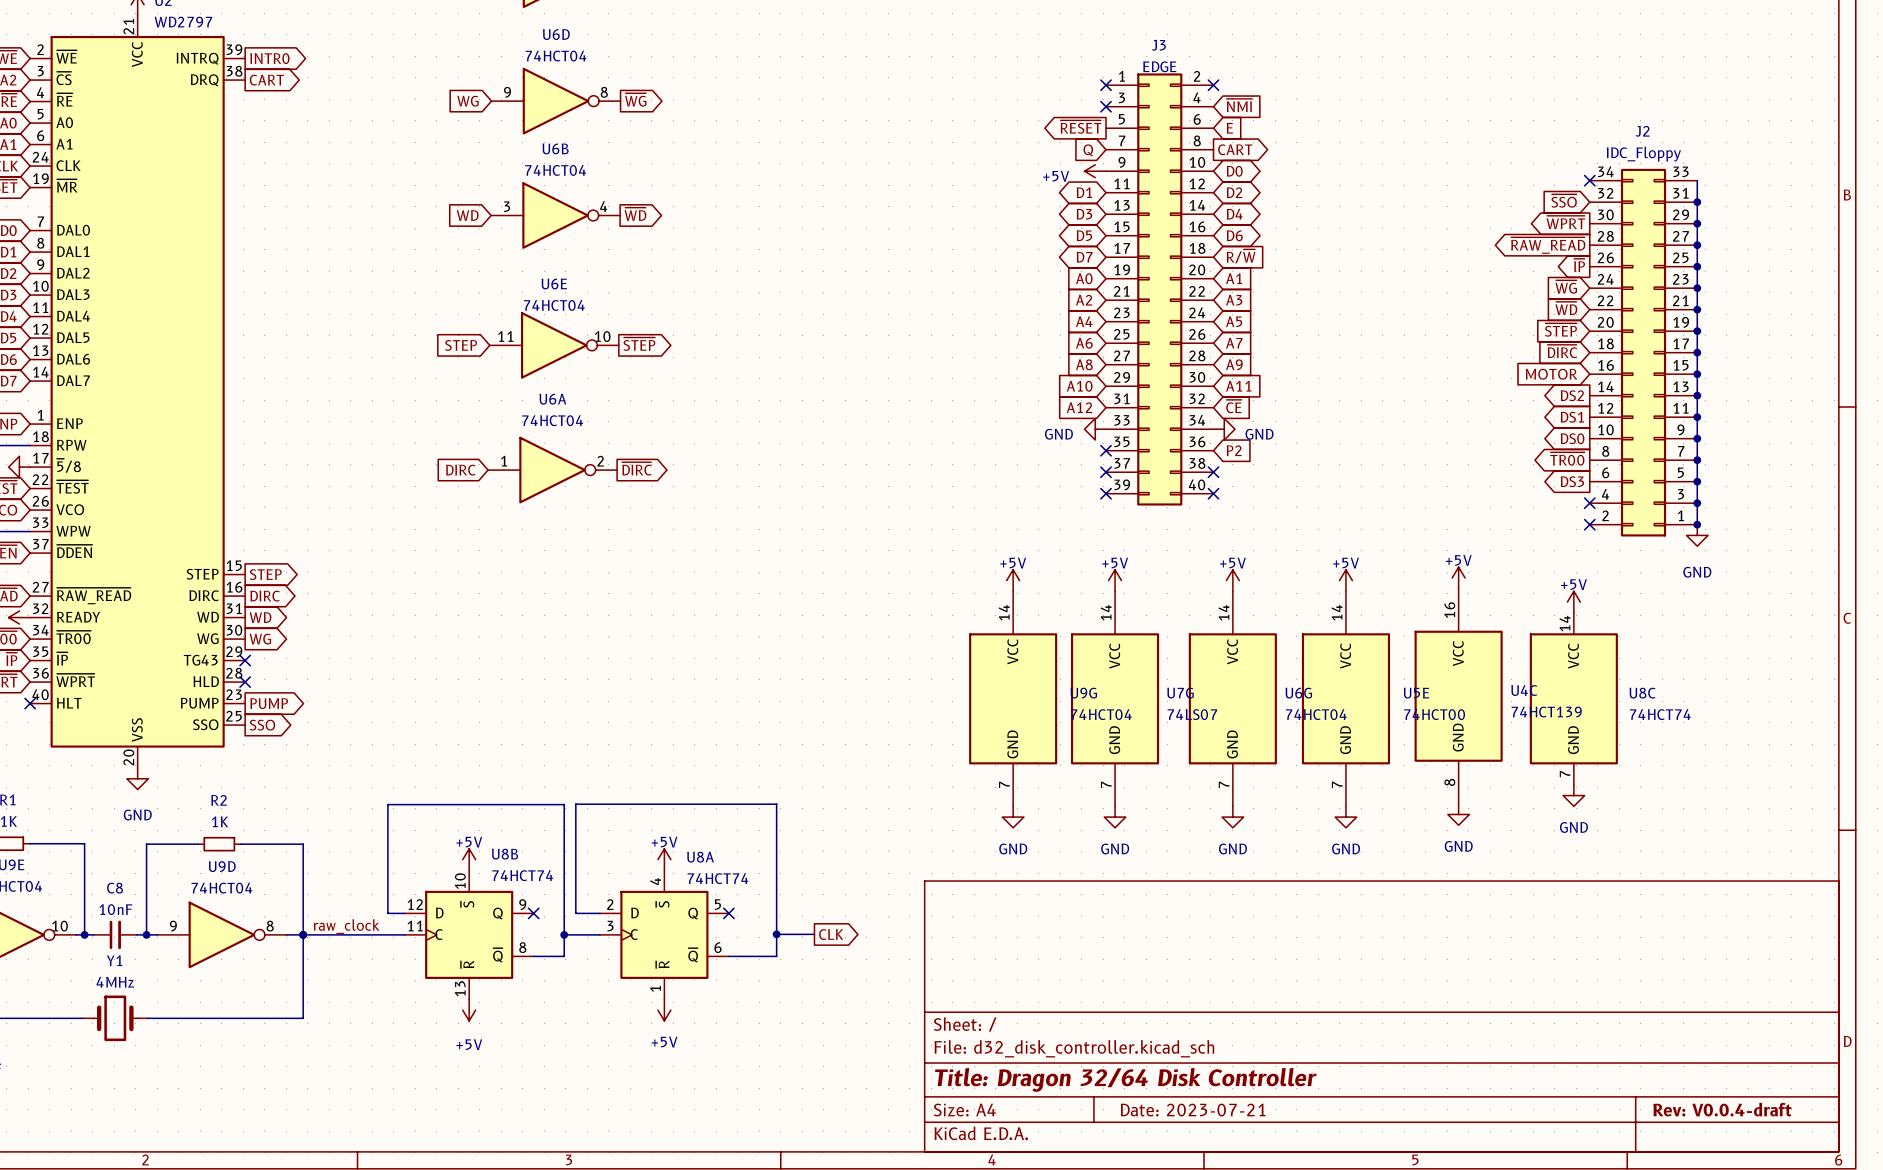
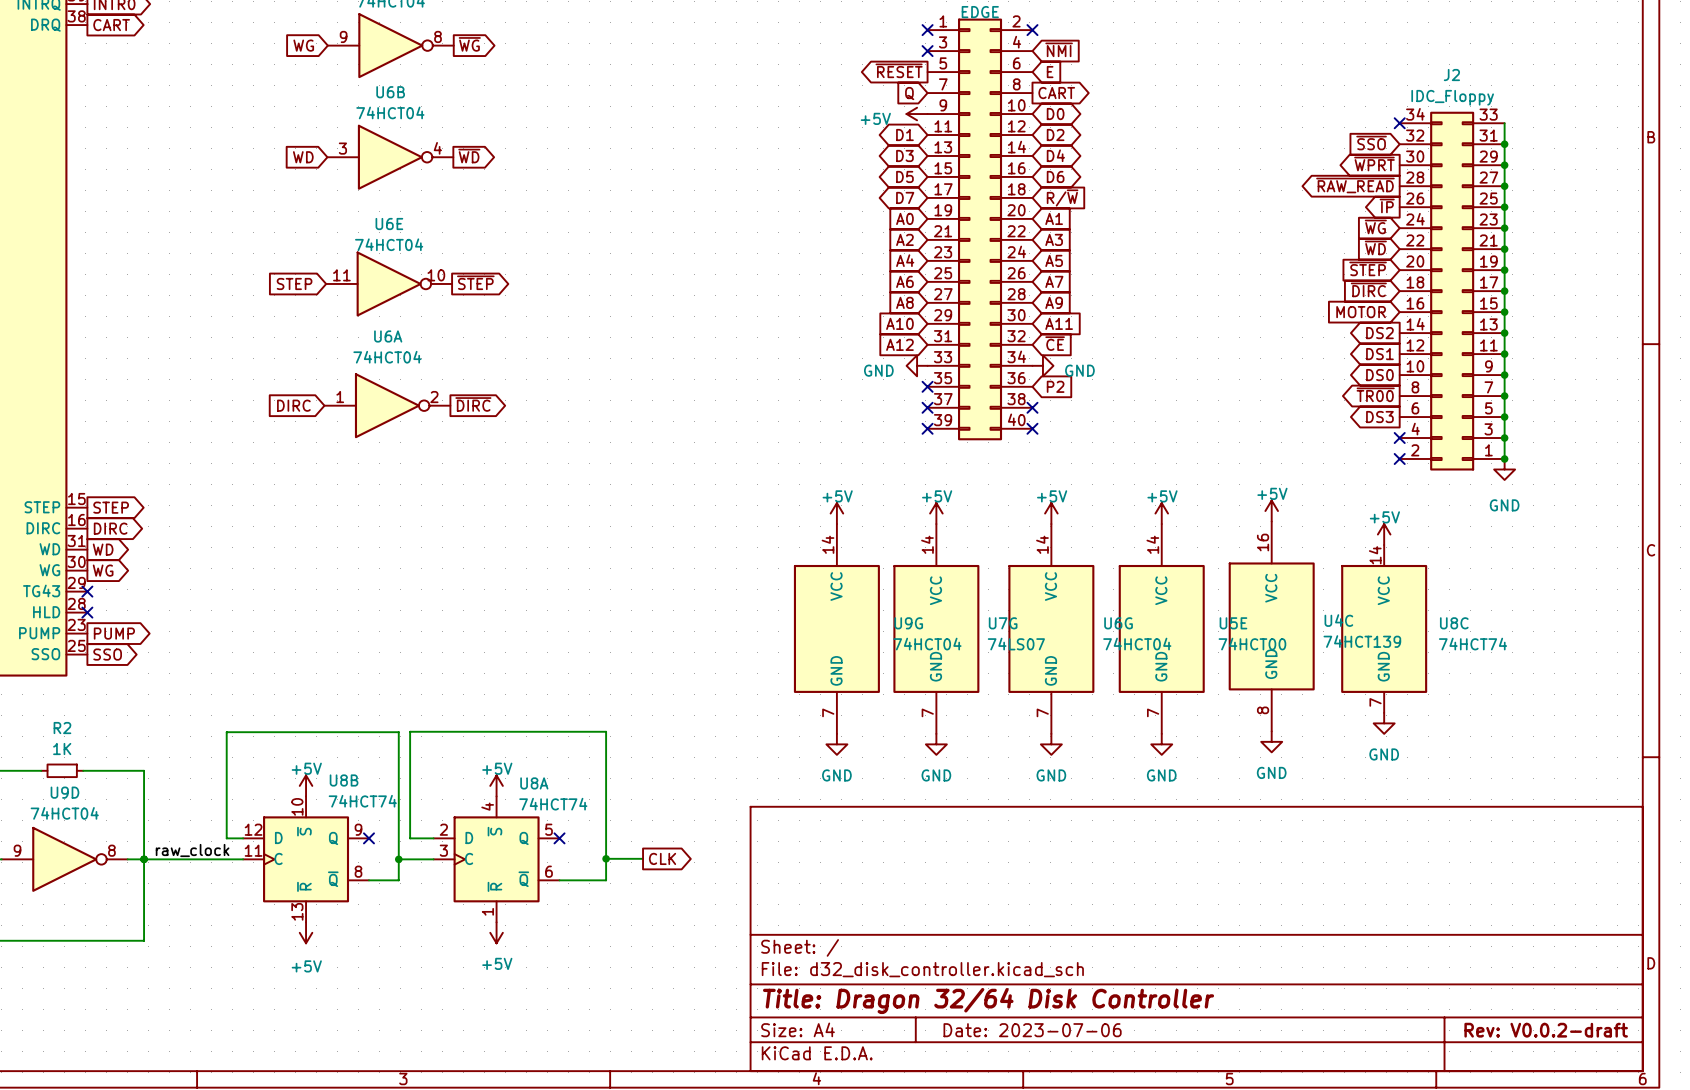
title block: Rev: V0.0.4-draft (1722, 1109) -> Rev: V0.0.2-draft (1546, 1030)
title block: Date: 2023-07-21 (1193, 1110) -> Date: 2023-07-06 (1032, 1030)

